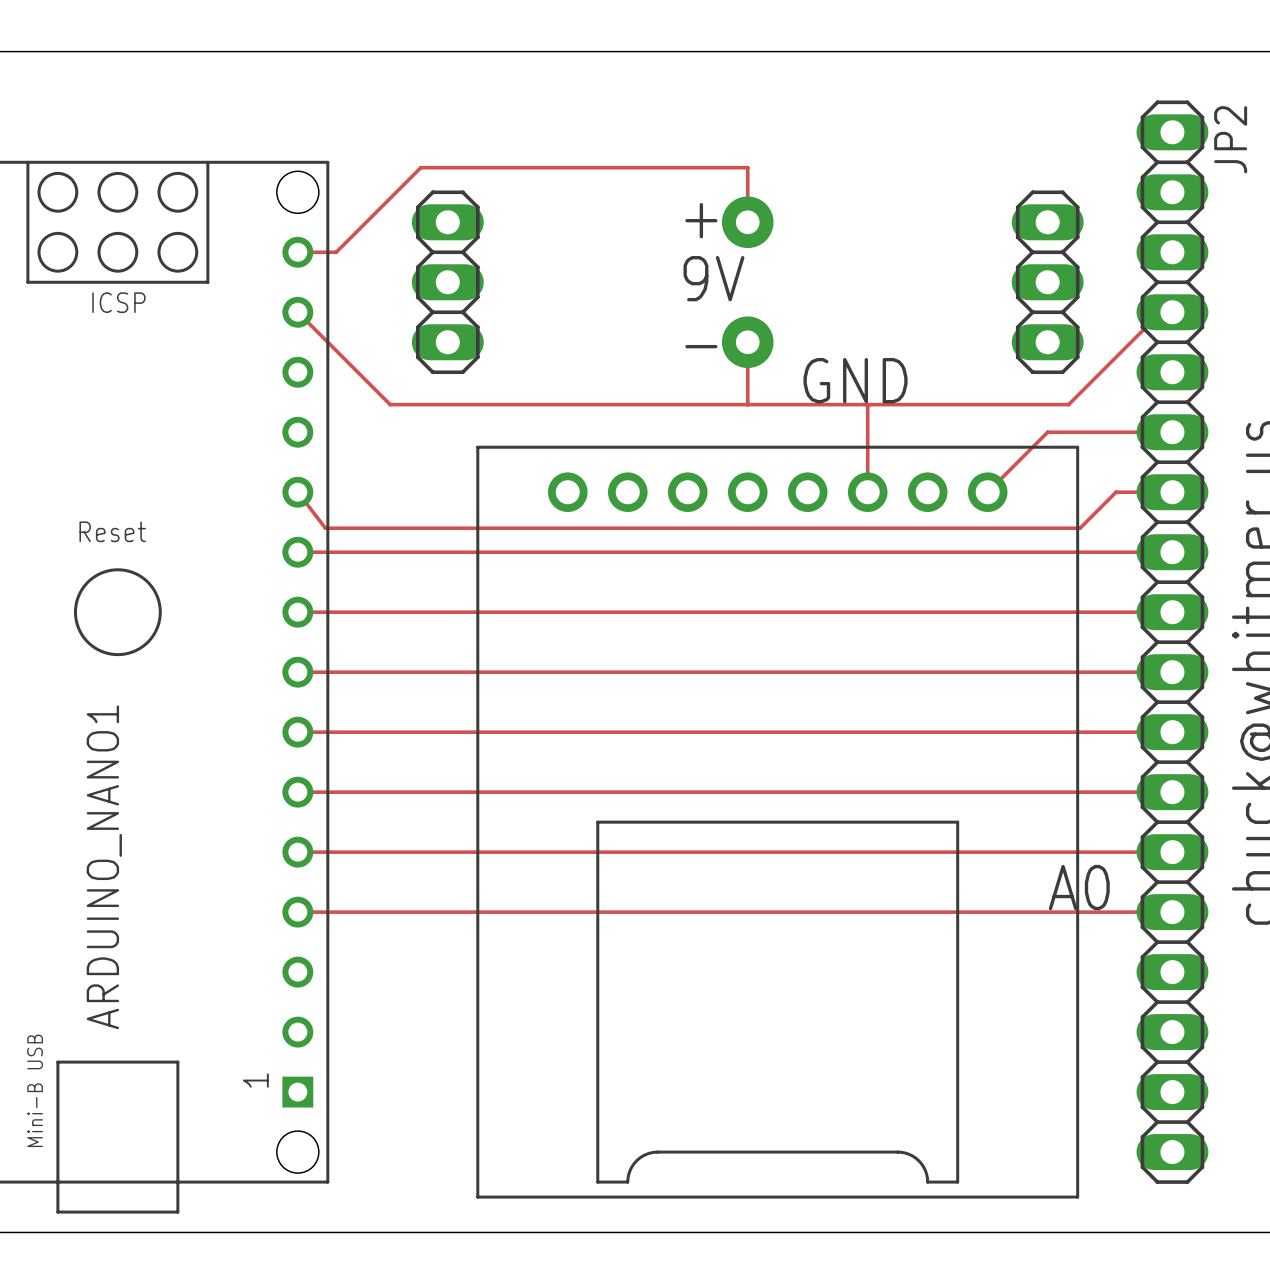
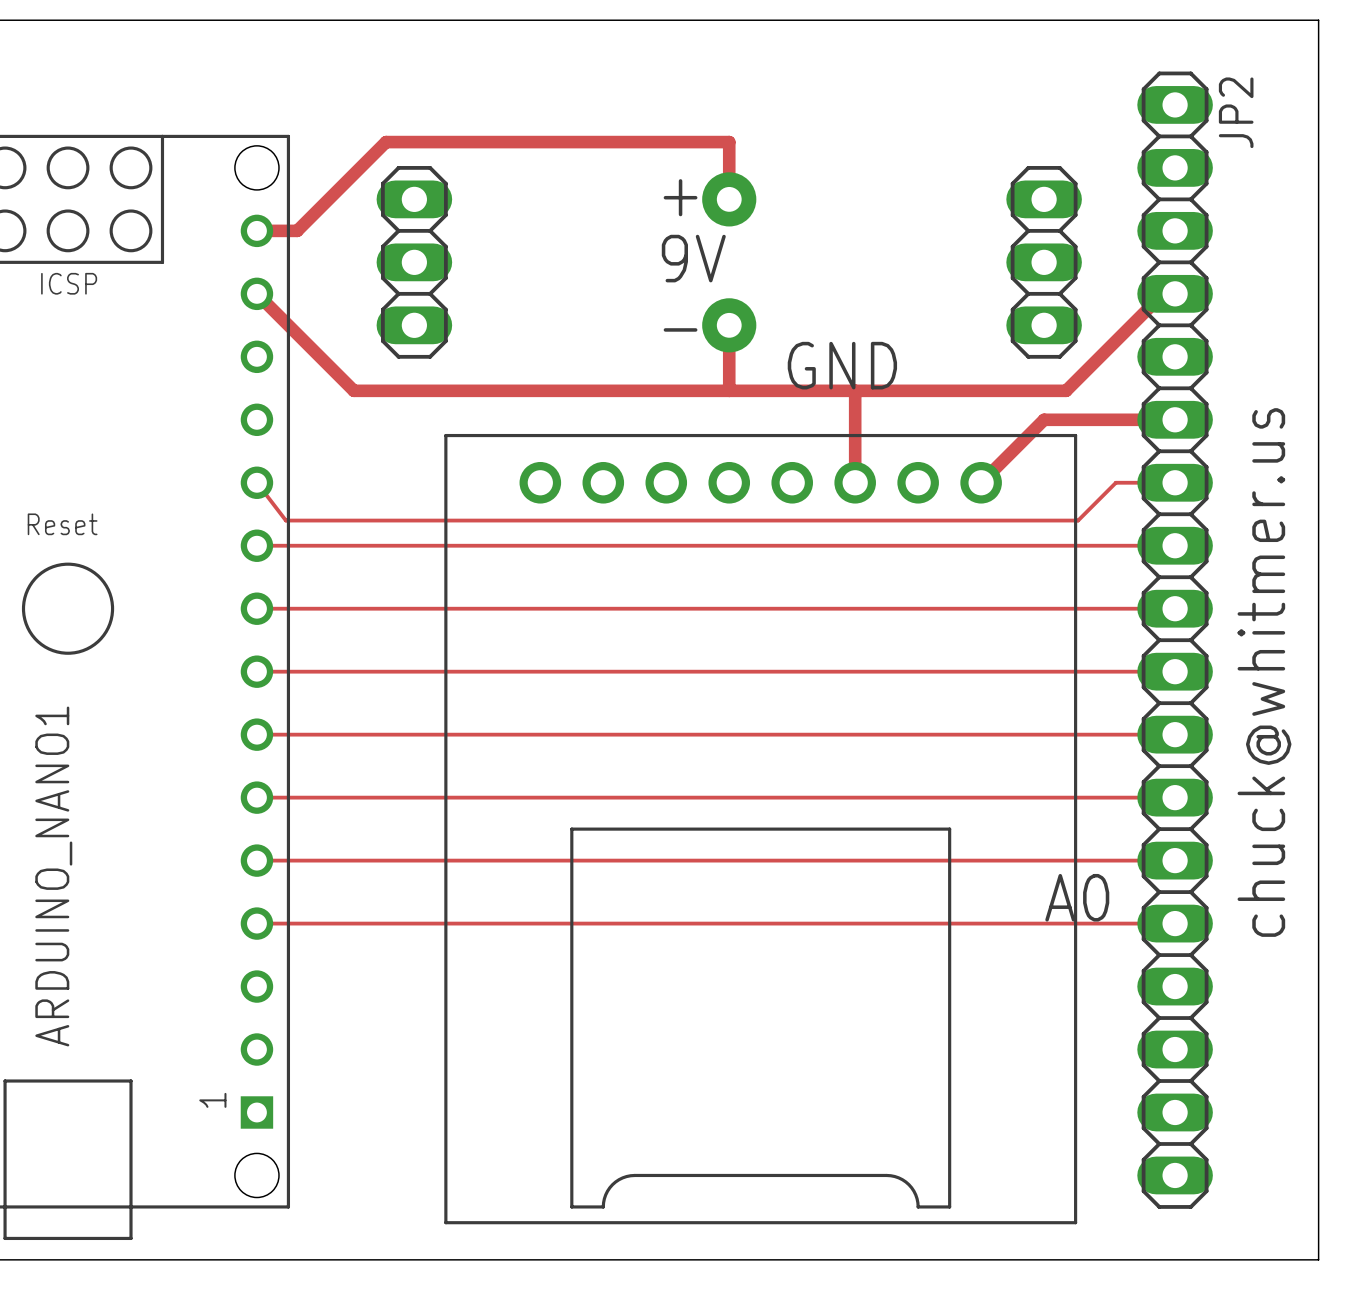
track width: thin (747, 222) (747, 167) (420, 167) (336, 252) (297, 252) -> thick (729, 199) (729, 142) (386, 142) (297, 230) (256, 230)
track width: thin (297, 312) (390, 404) (1068, 404) (1161, 312) -> thick (256, 293) (353, 390) (1066, 390) (1163, 293)
track width: thin (747, 342) (747, 404) -> thick (729, 325) (729, 390)
track width: thin (867, 404) (867, 492) -> thick (855, 390) (855, 482)
track width: thin (1172, 432) (1047, 432) (987, 492) -> thick (1175, 419) (1044, 419) (981, 482)

